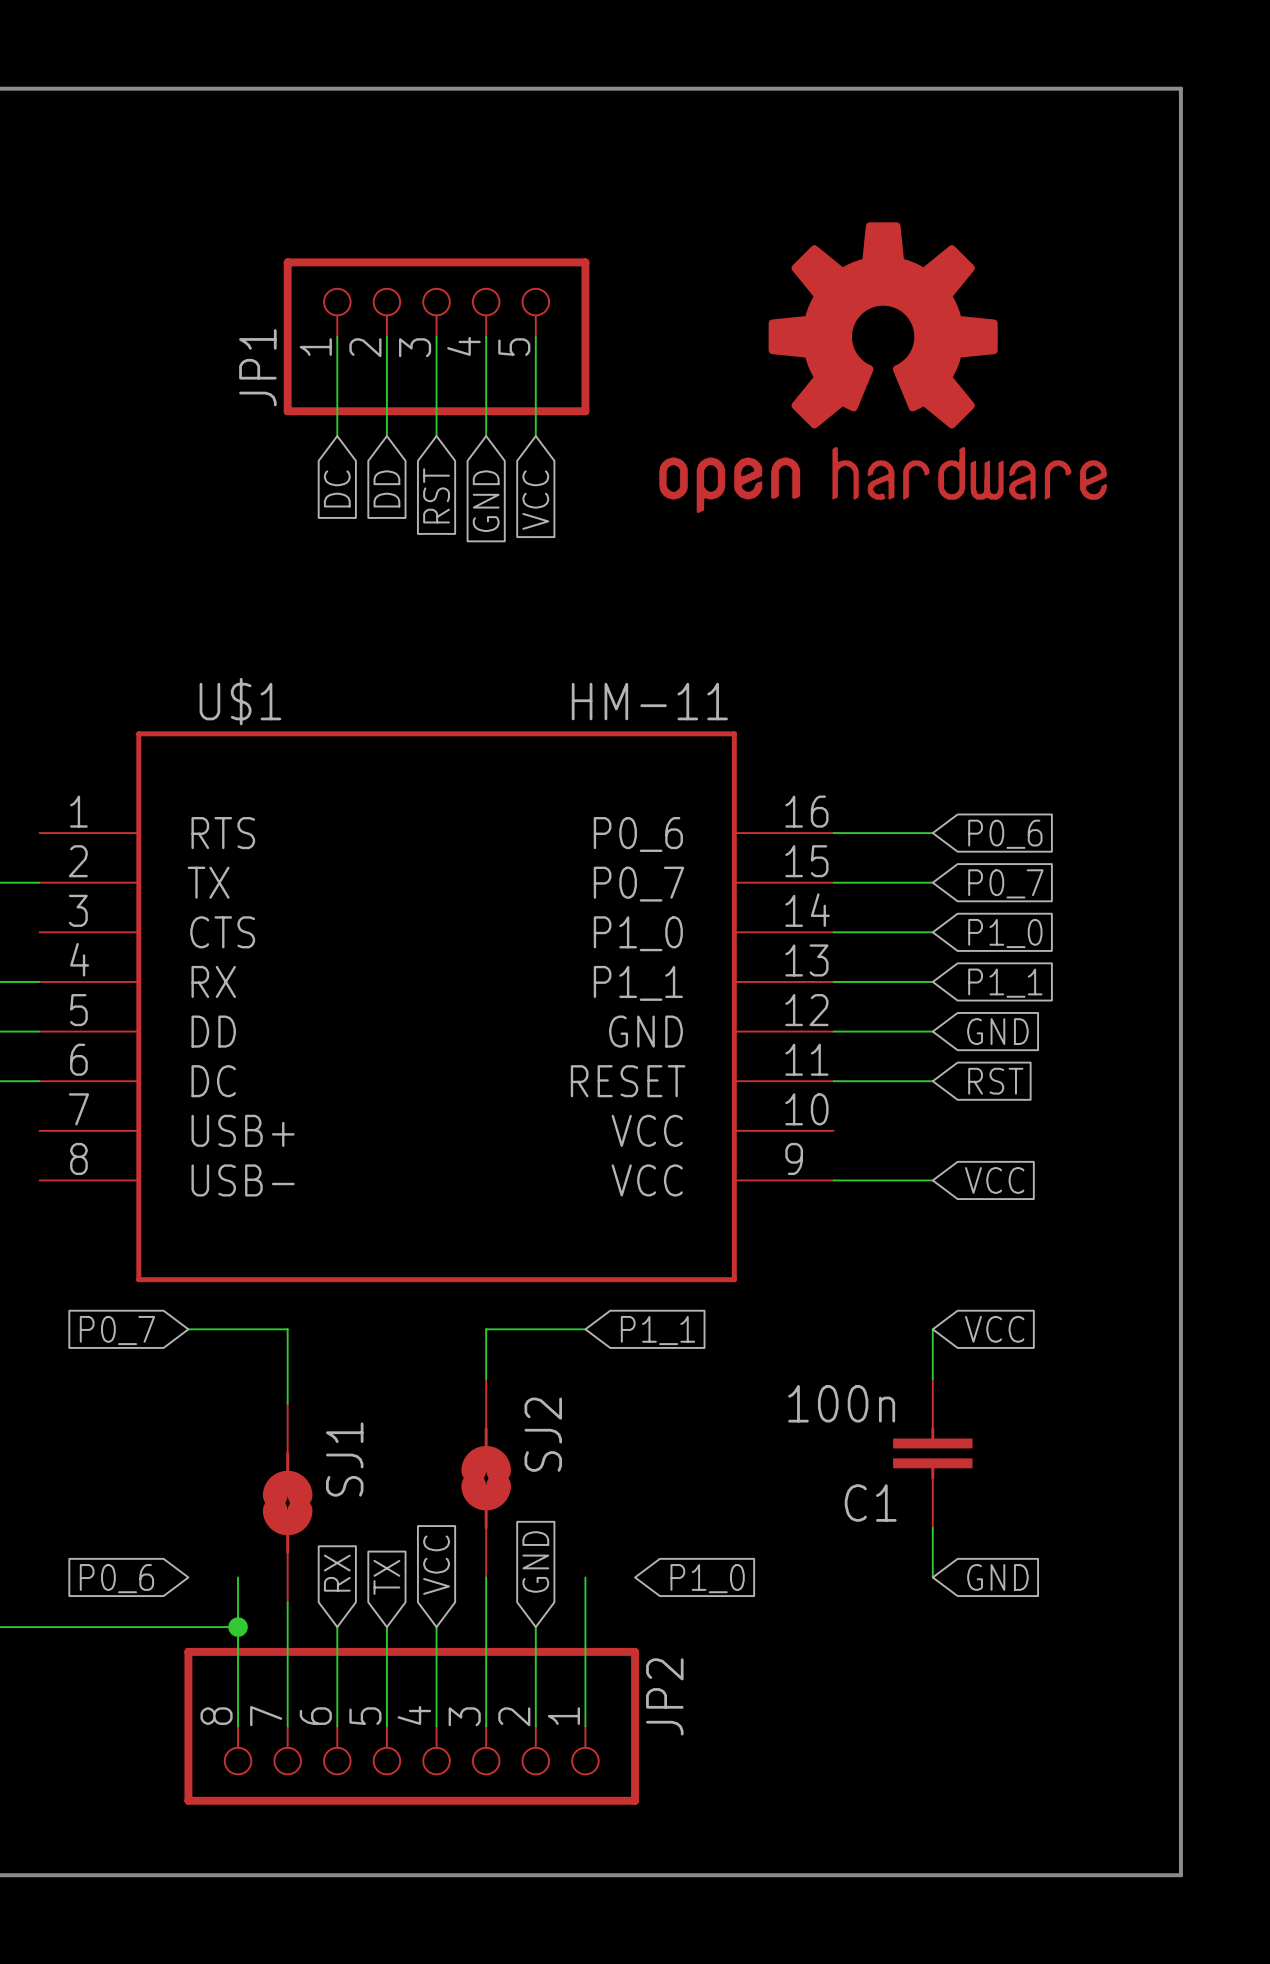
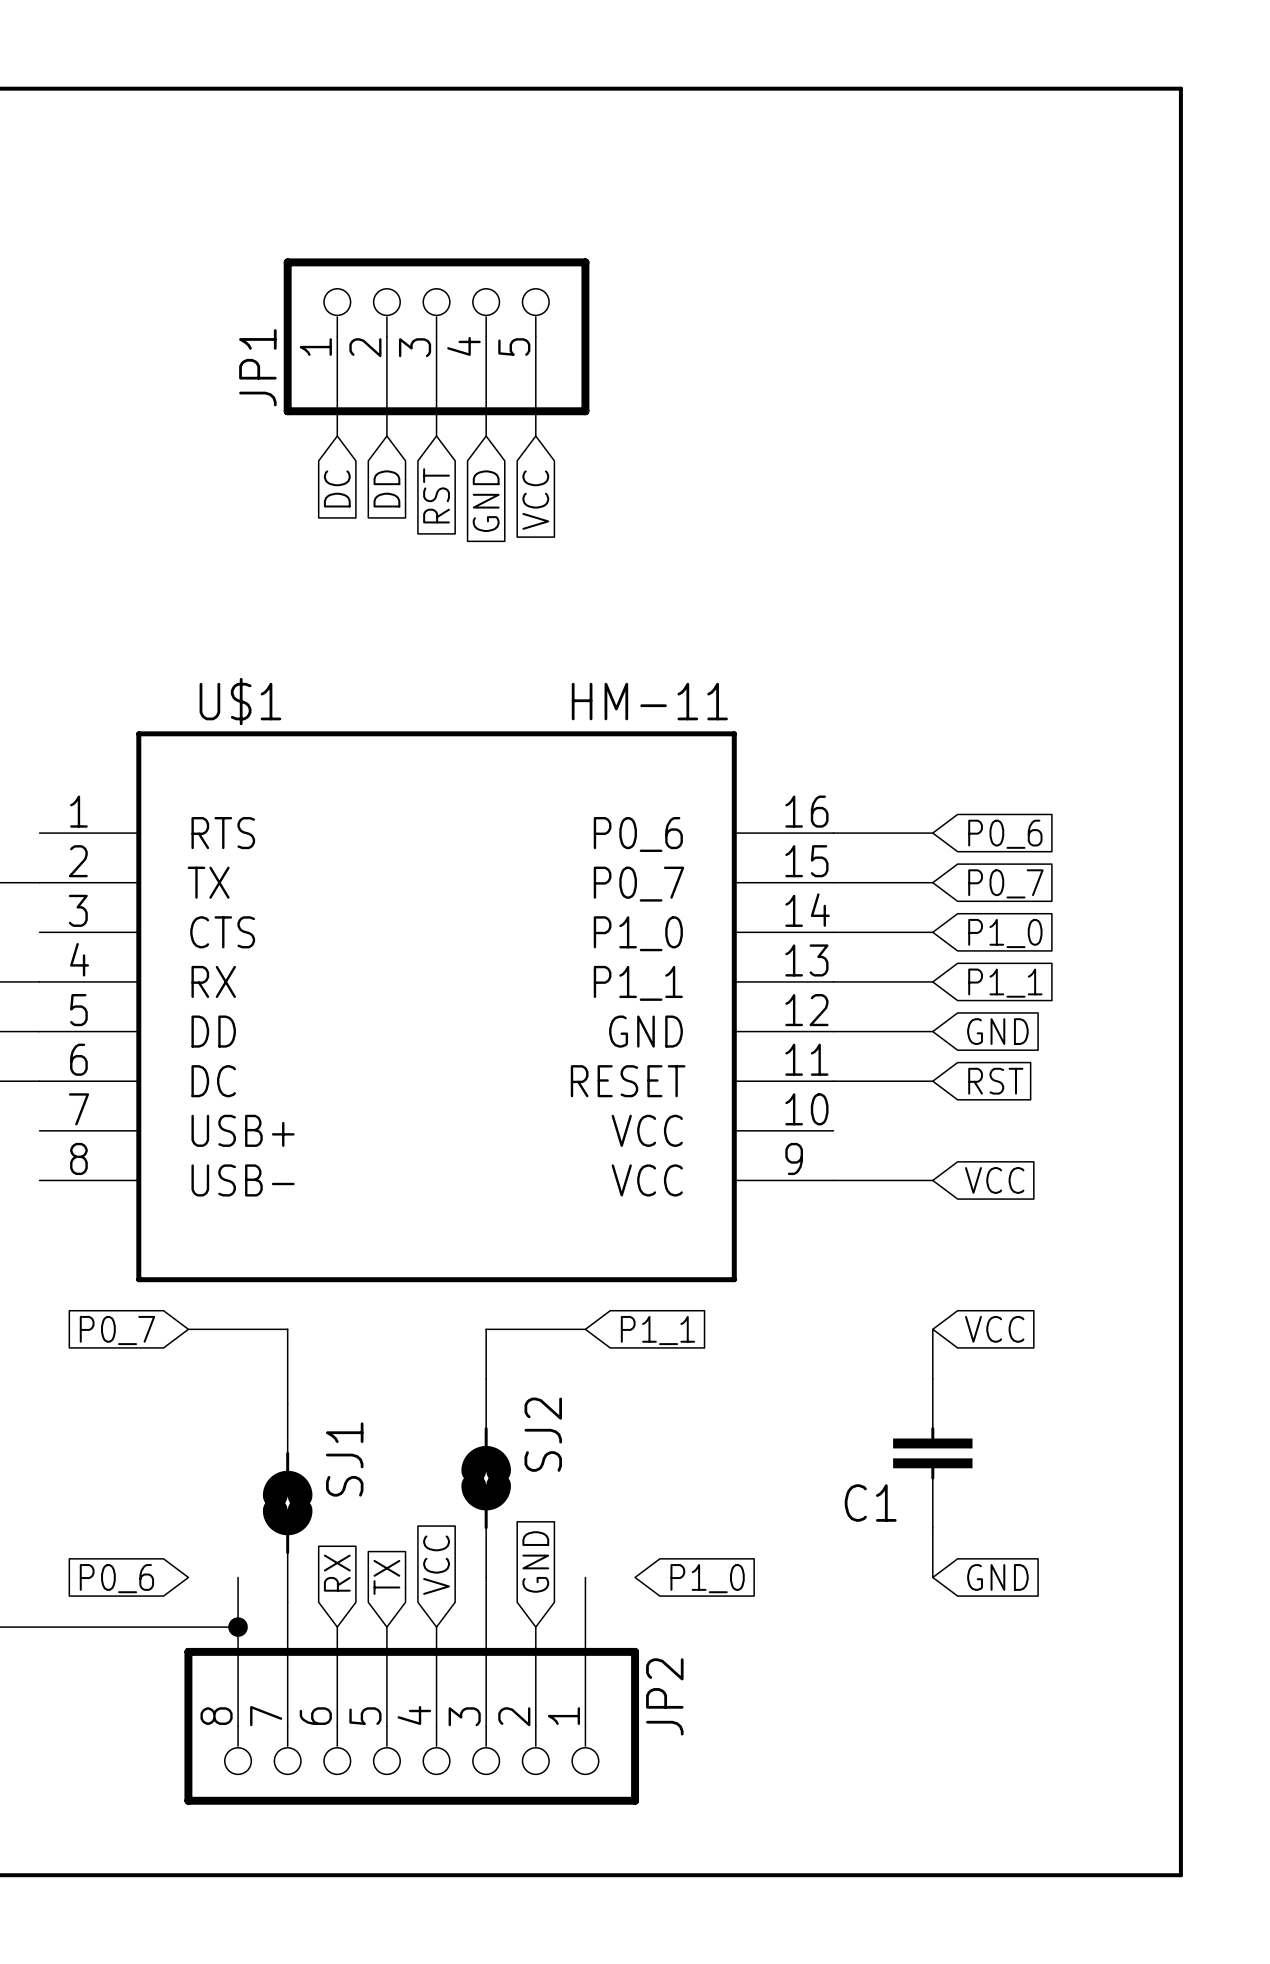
part: (883, 367) -> none
C1 value: 100n (841, 1403) -> none

